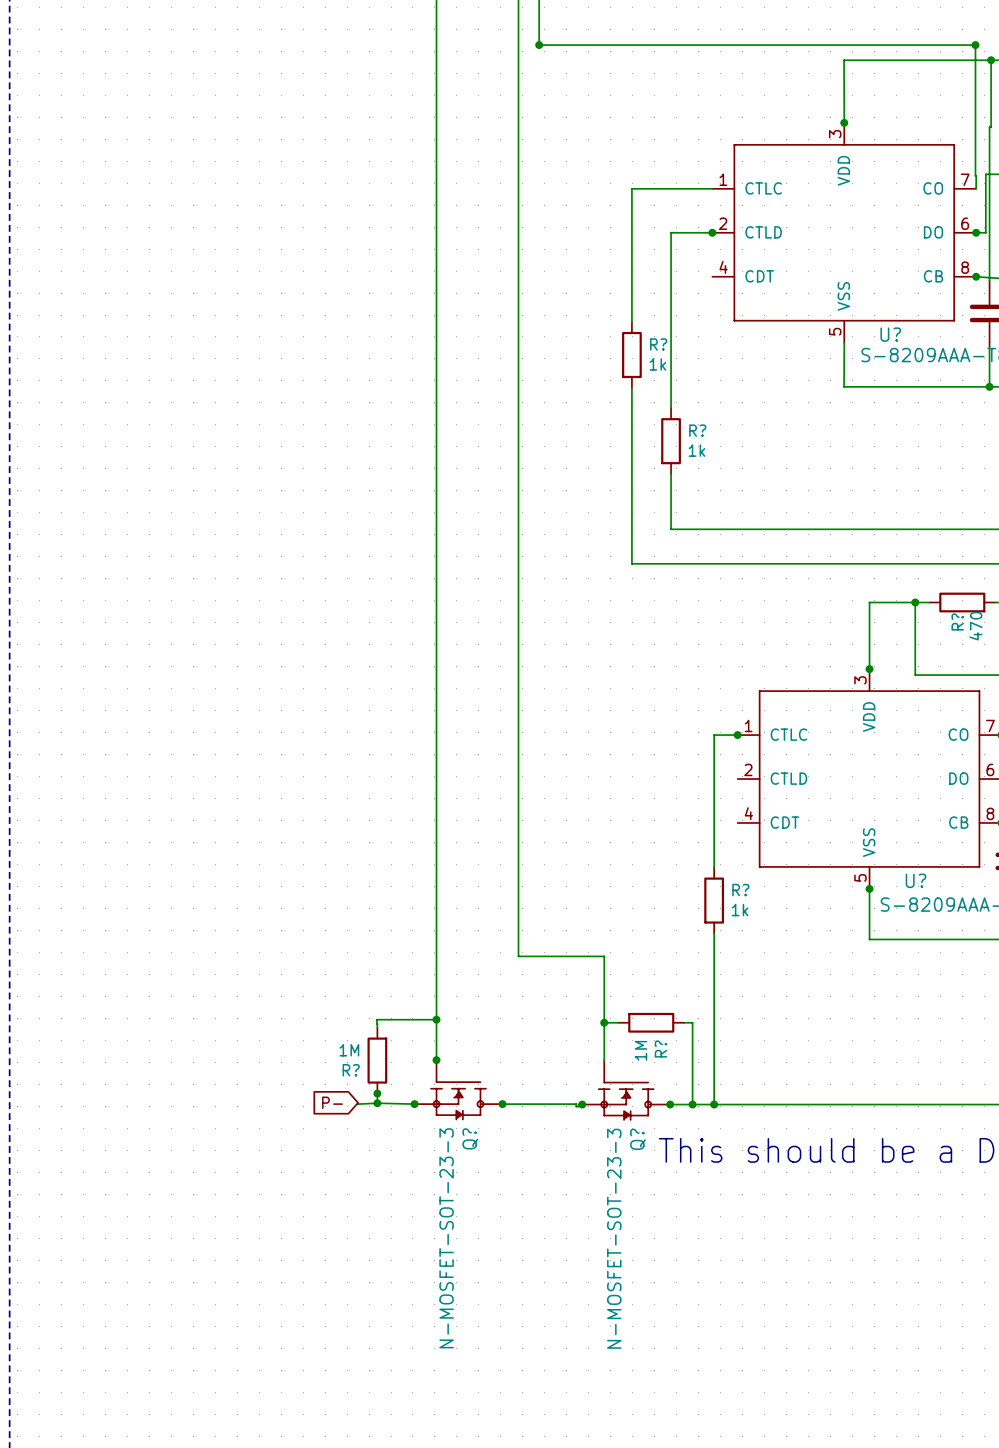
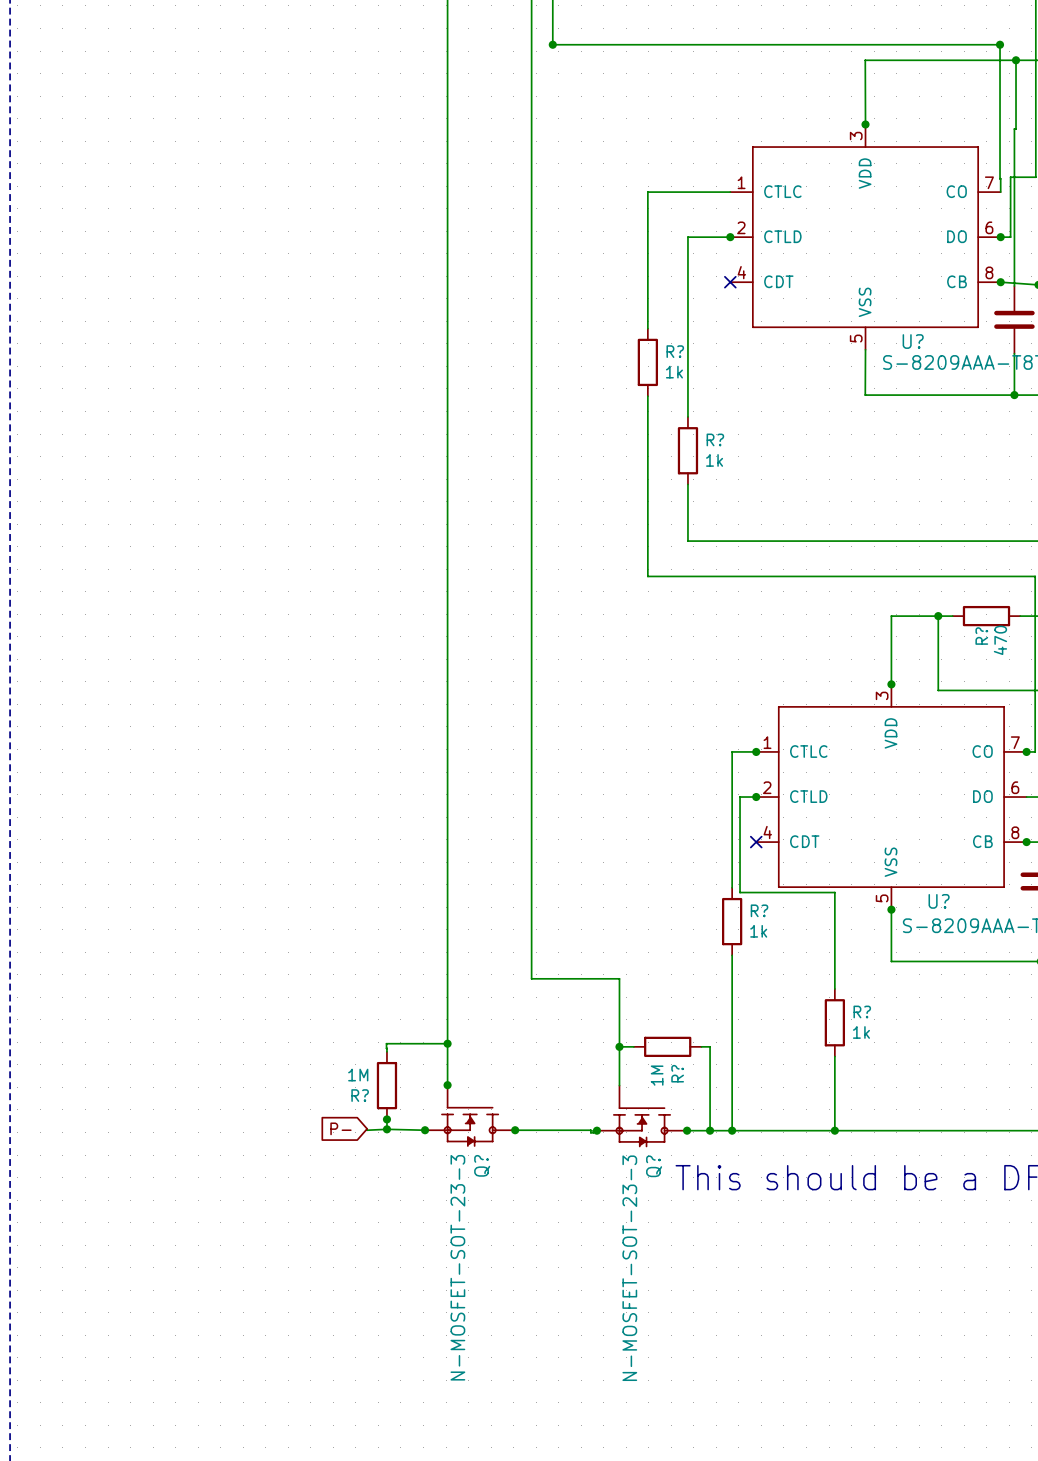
no-connect mark: none -> (730, 282)
wire: none -> (756, 797) (740, 797) (740, 892) (834, 892) (834, 988)
junction: none -> (756, 797)
no-connect mark: none -> (756, 842)
R?: none -> 1k (834, 1022)
wire: none -> (834, 1056) (834, 1130)
junction: none -> (834, 1130)

